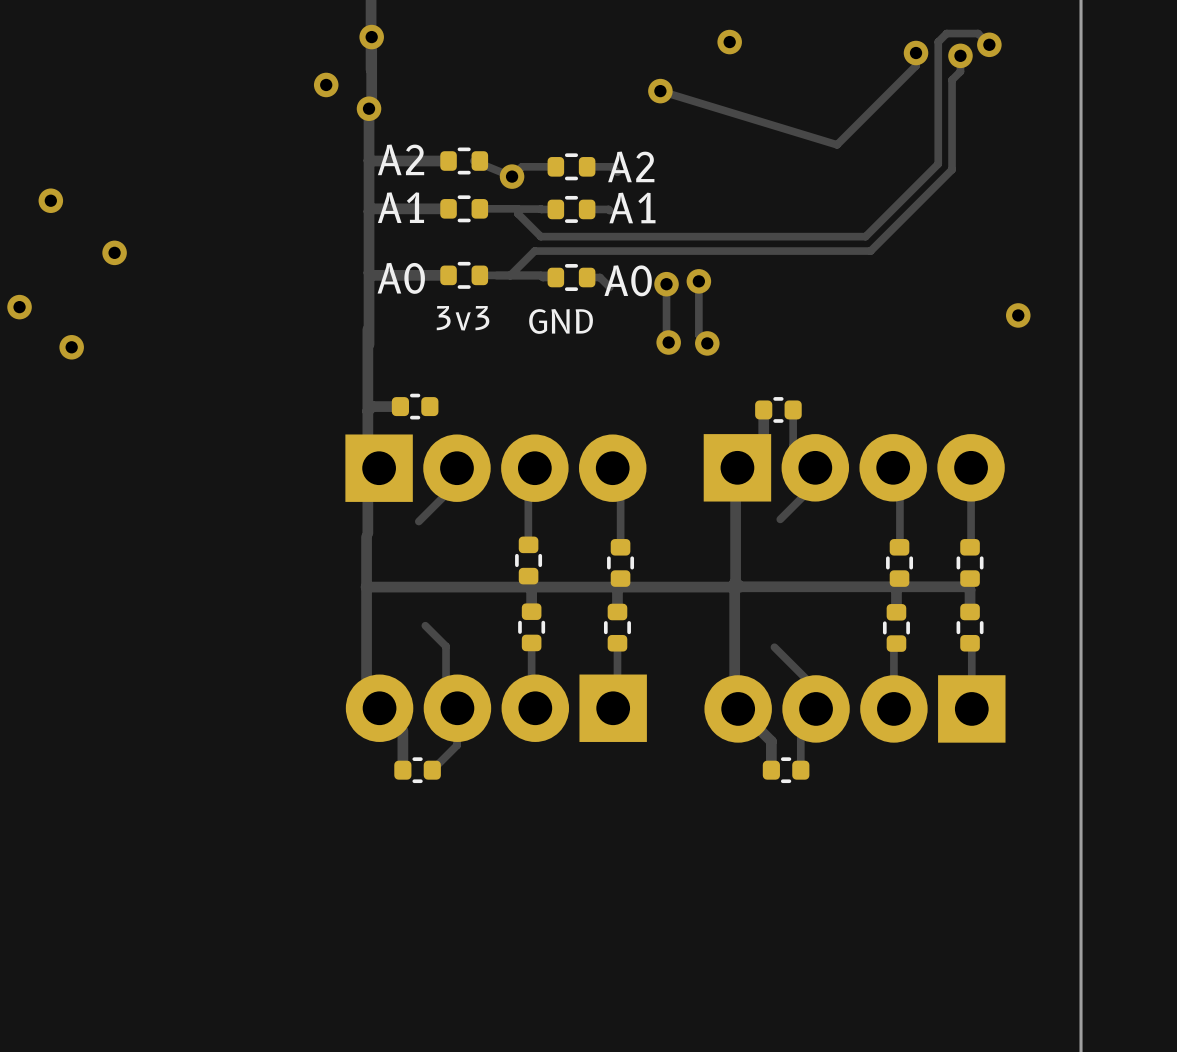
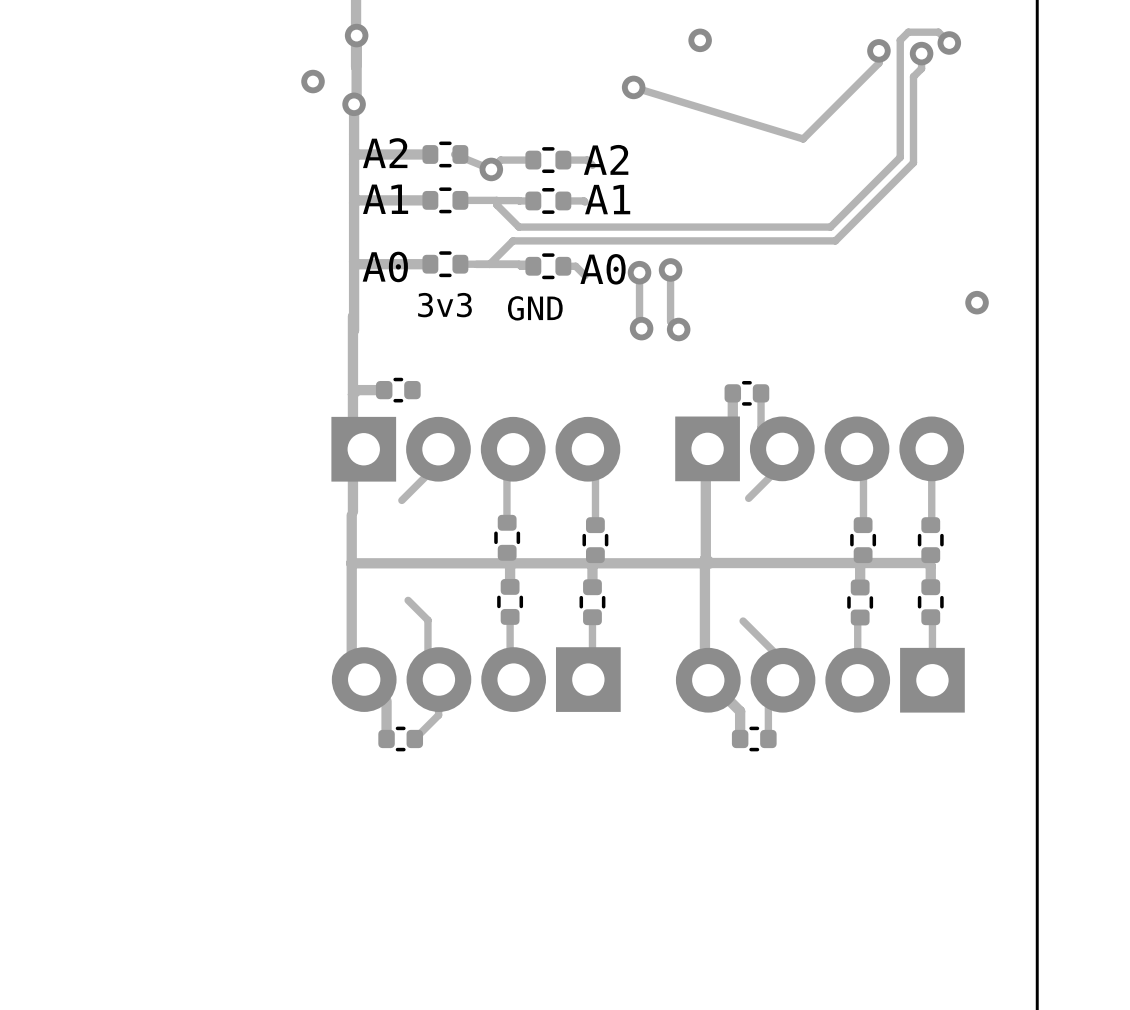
via: (50, 200) -> none
via: (114, 252) -> none
via: (19, 307) -> none
via: (71, 347) -> none

